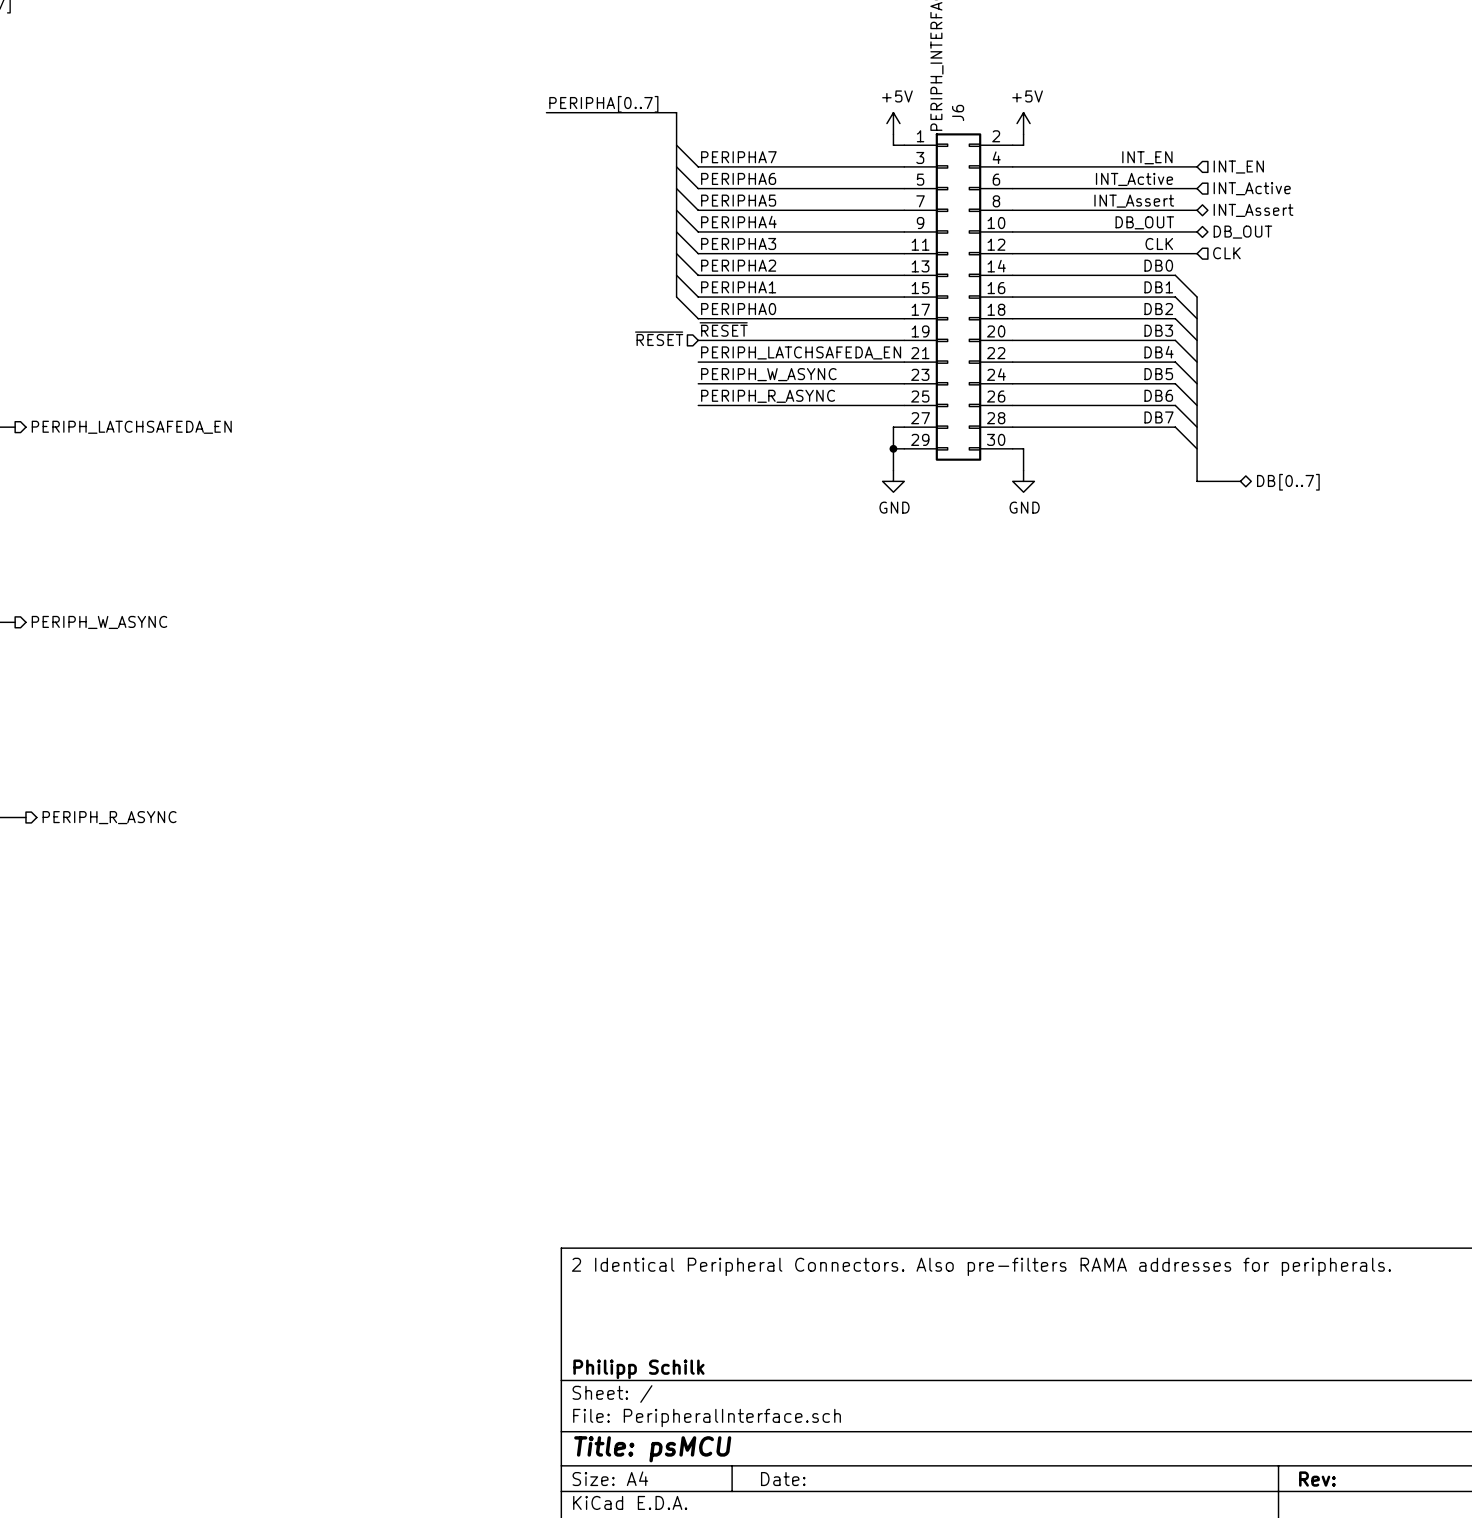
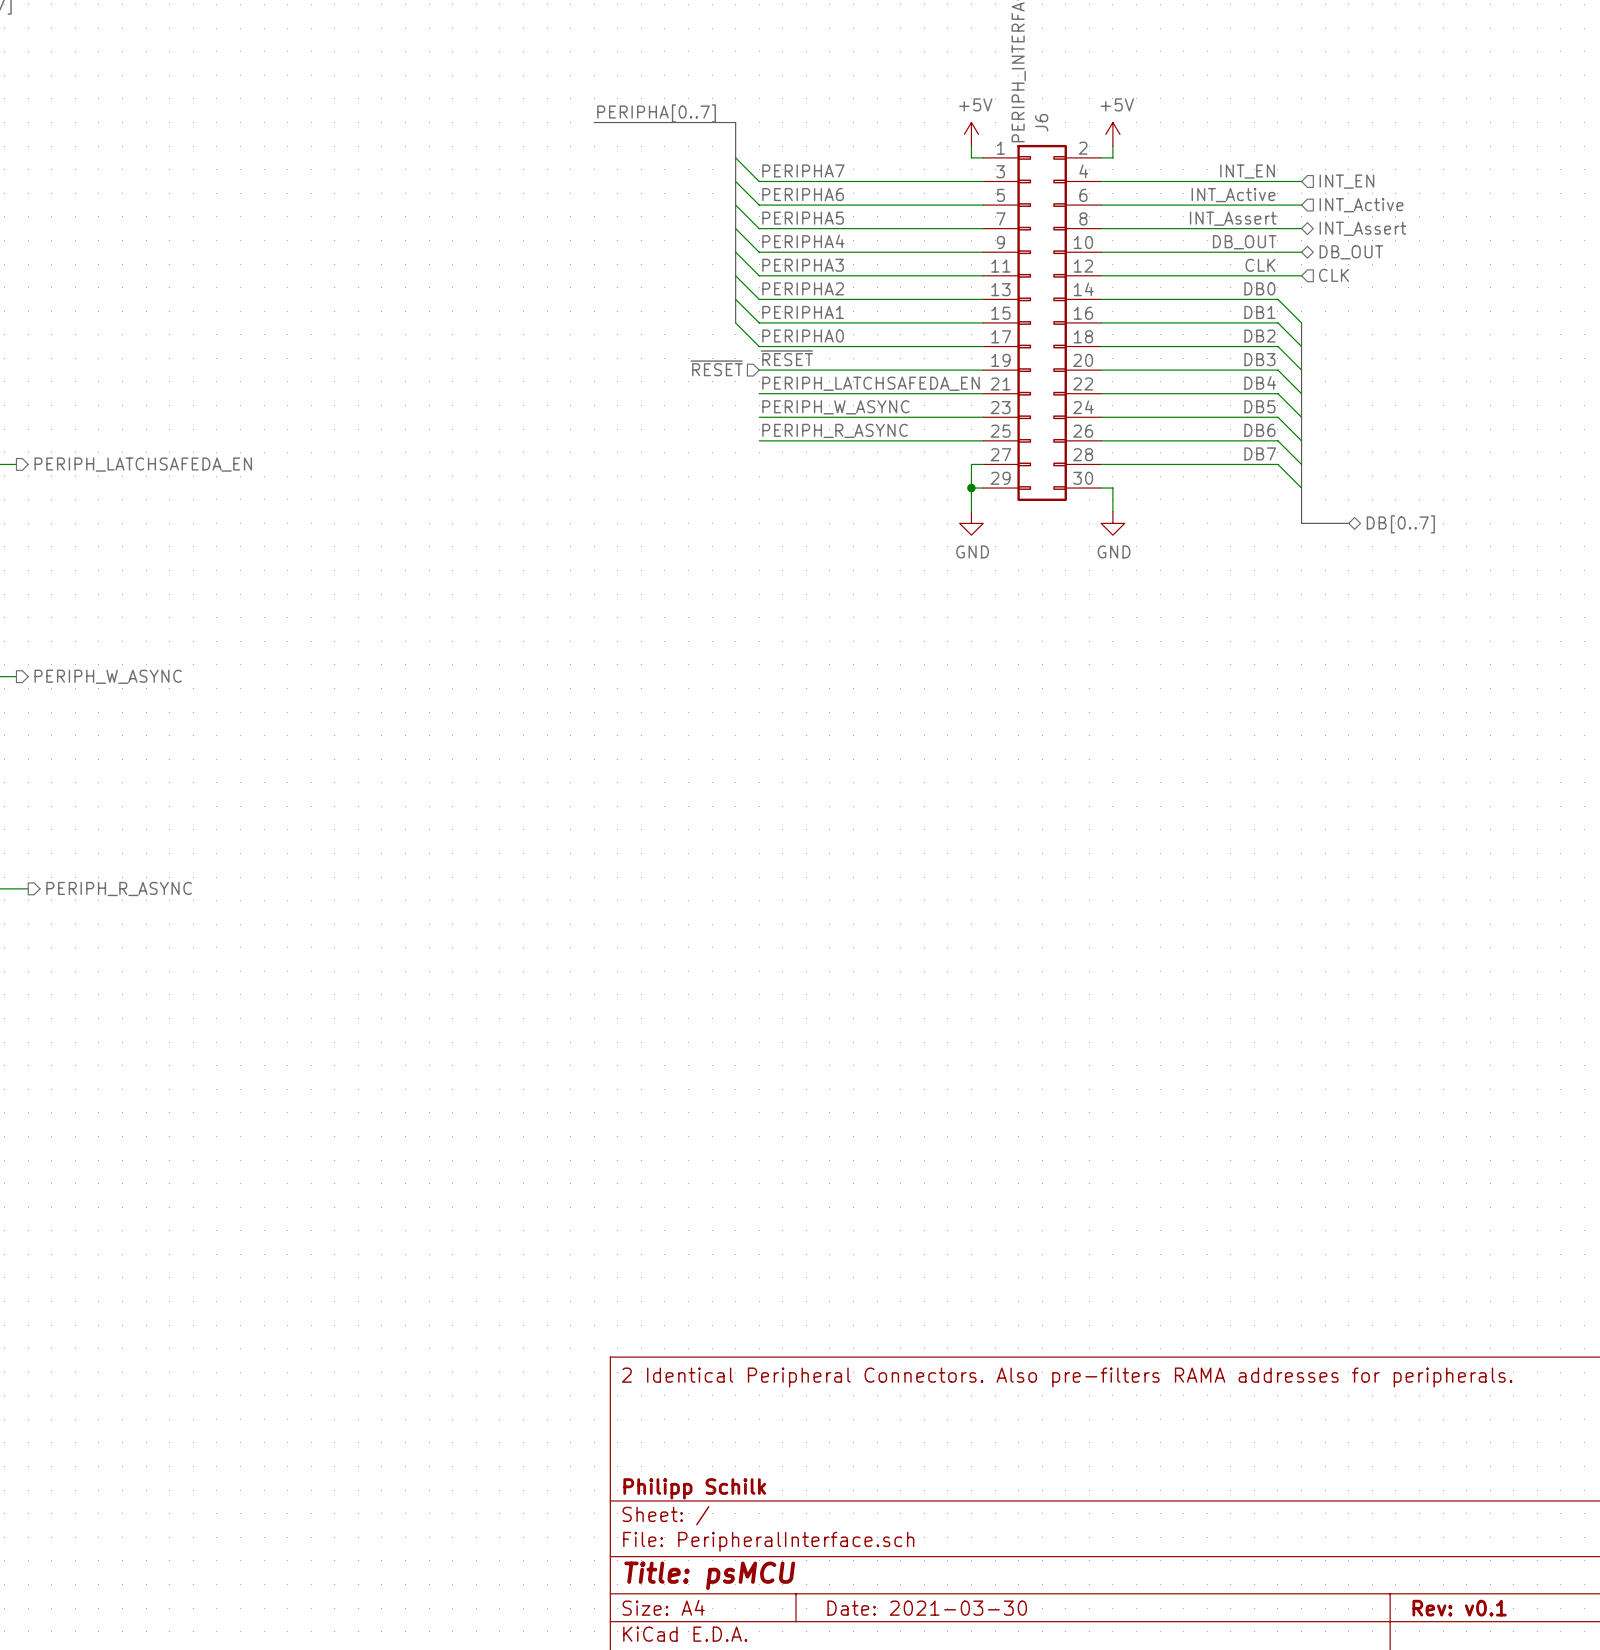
title block: Date: (783, 1479) -> Date: 2021-03-30 (927, 1608)
title block: Rev: (1317, 1479) -> Rev: v0.1 (1459, 1608)

